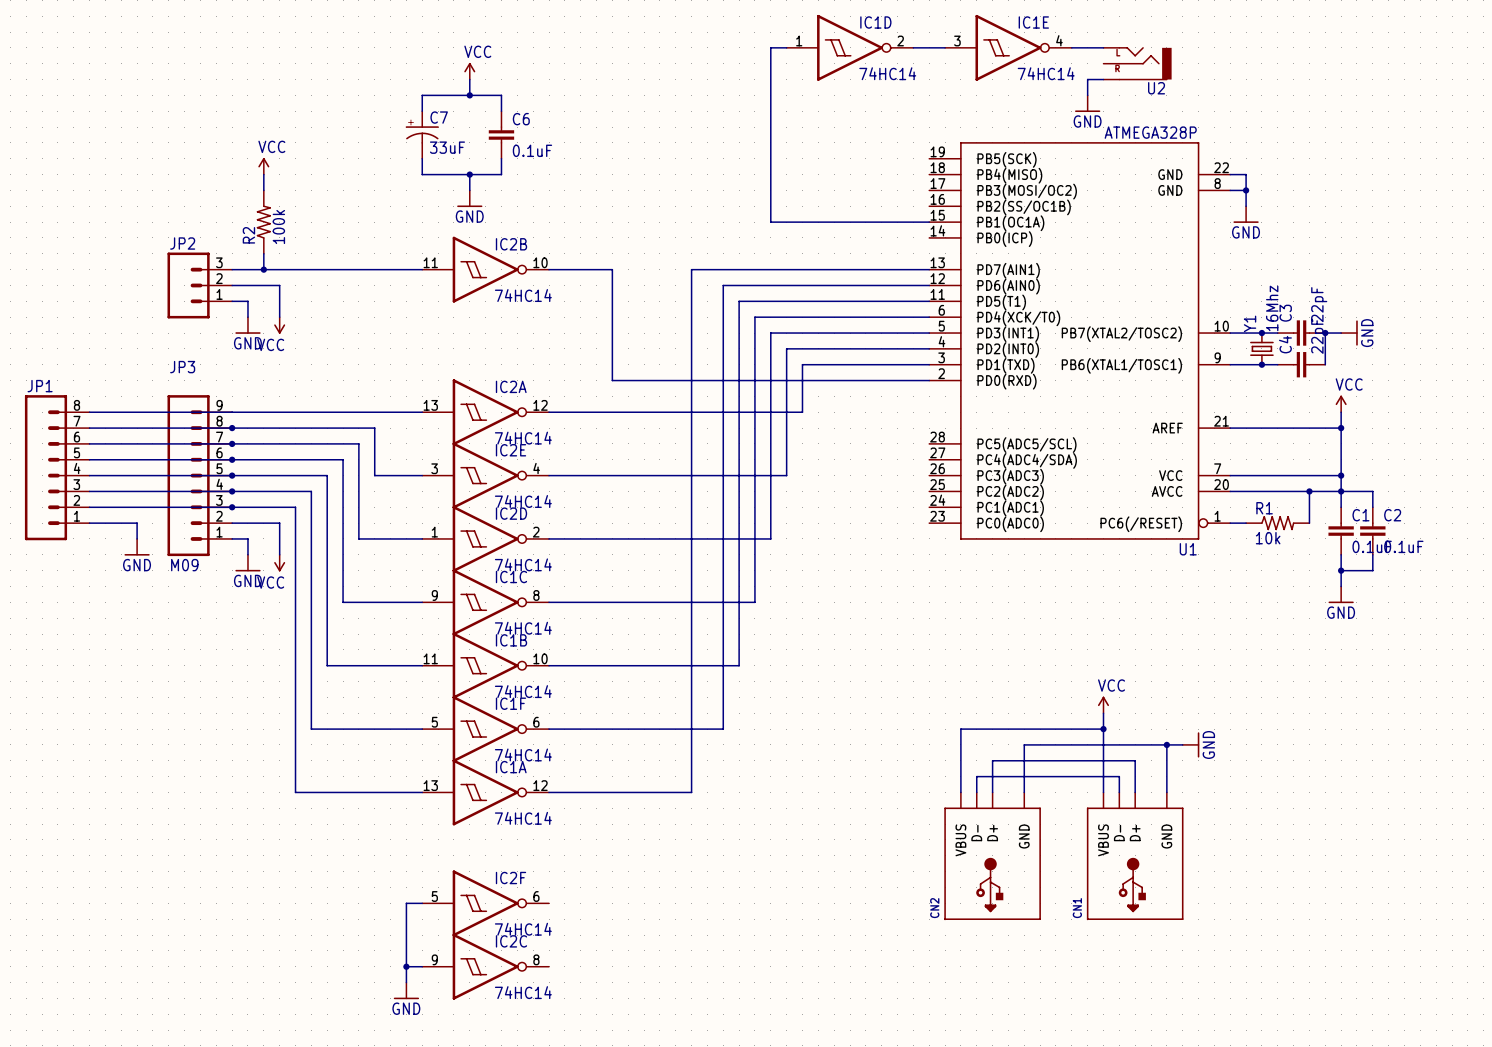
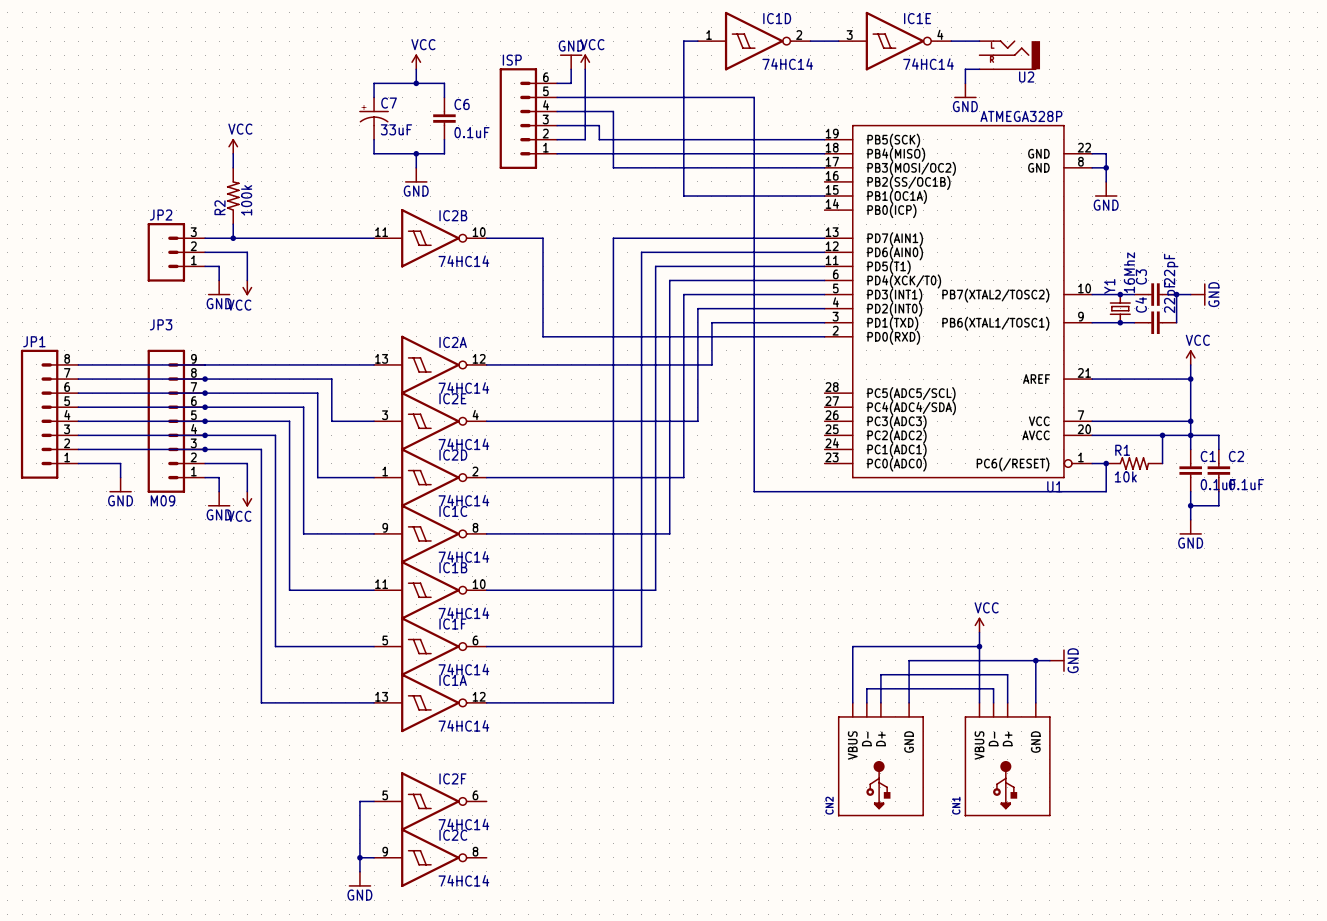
power symbol: none -> GND (571, 61)
power symbol: none -> VCC (585, 61)
wire: none -> (571, 69) (571, 83) (557, 83)
wire: none -> (585, 69) (585, 139) (557, 139)
wire: none -> (557, 97) (754, 97) (754, 491) (1106, 491) (1106, 463)
wire: none -> (557, 111) (613, 111) (613, 167) (824, 167)
ISP: none -> (528, 118)
wire: none -> (557, 125) (599, 125) (599, 139) (824, 139)
wire: none -> (557, 153) (824, 153)
junction: none -> (1106, 463)

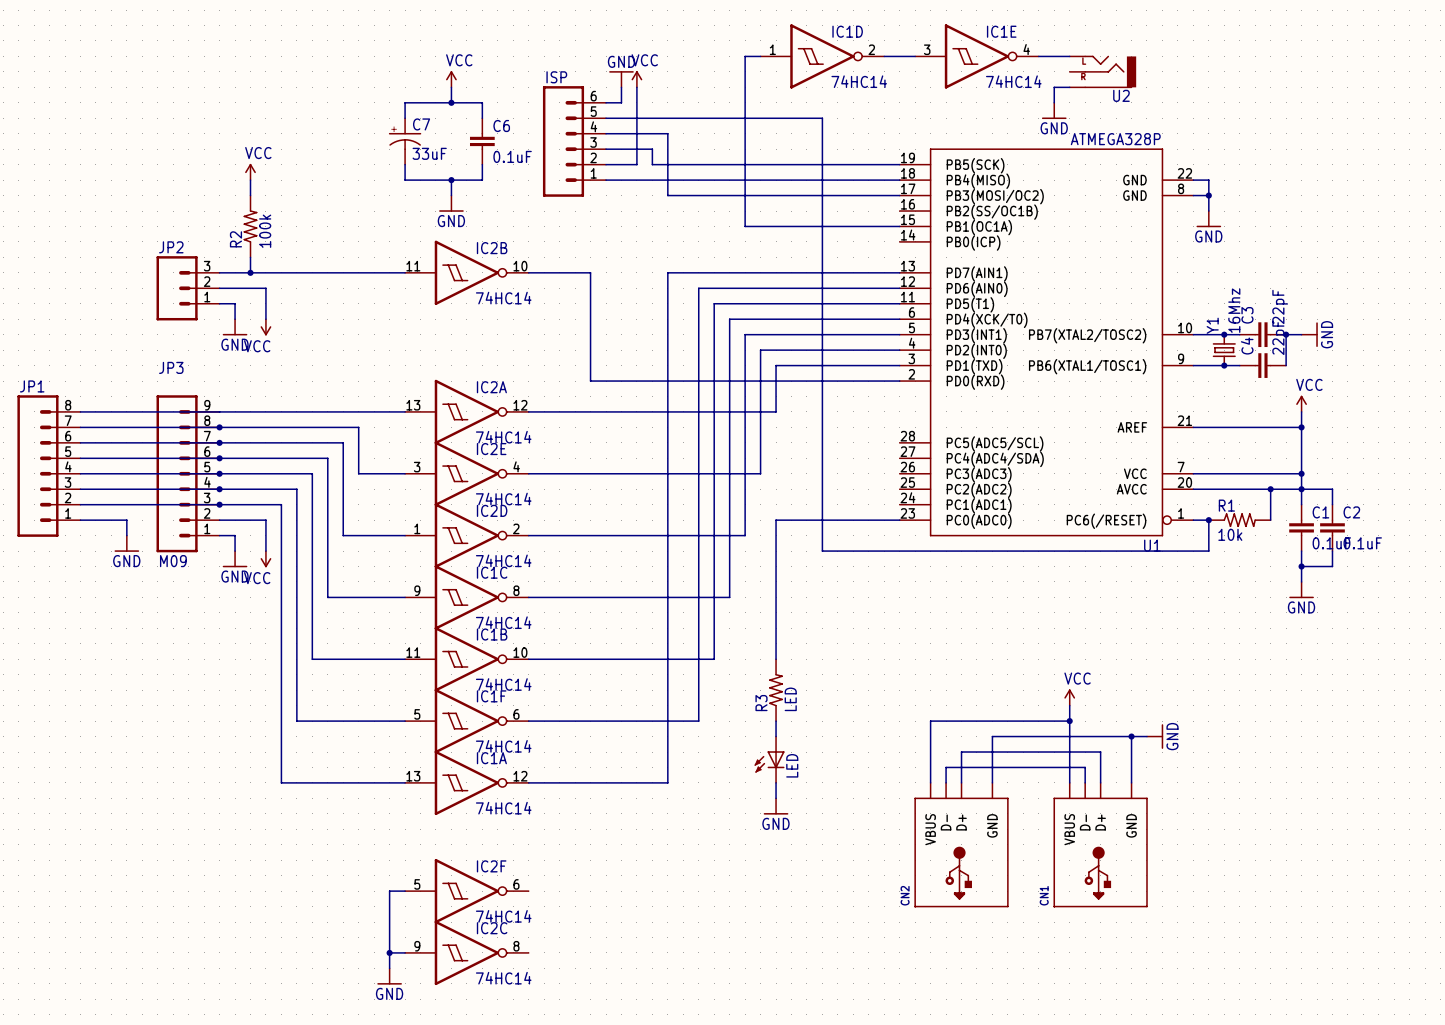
wire: none -> (899, 520) (776, 520) (776, 659)
R3: none -> LED (776, 690)
wire: none -> (776, 721) (776, 736)
LED: none -> (769, 759)
wire: none -> (776, 782) (776, 798)
power symbol: none -> GND (776, 806)

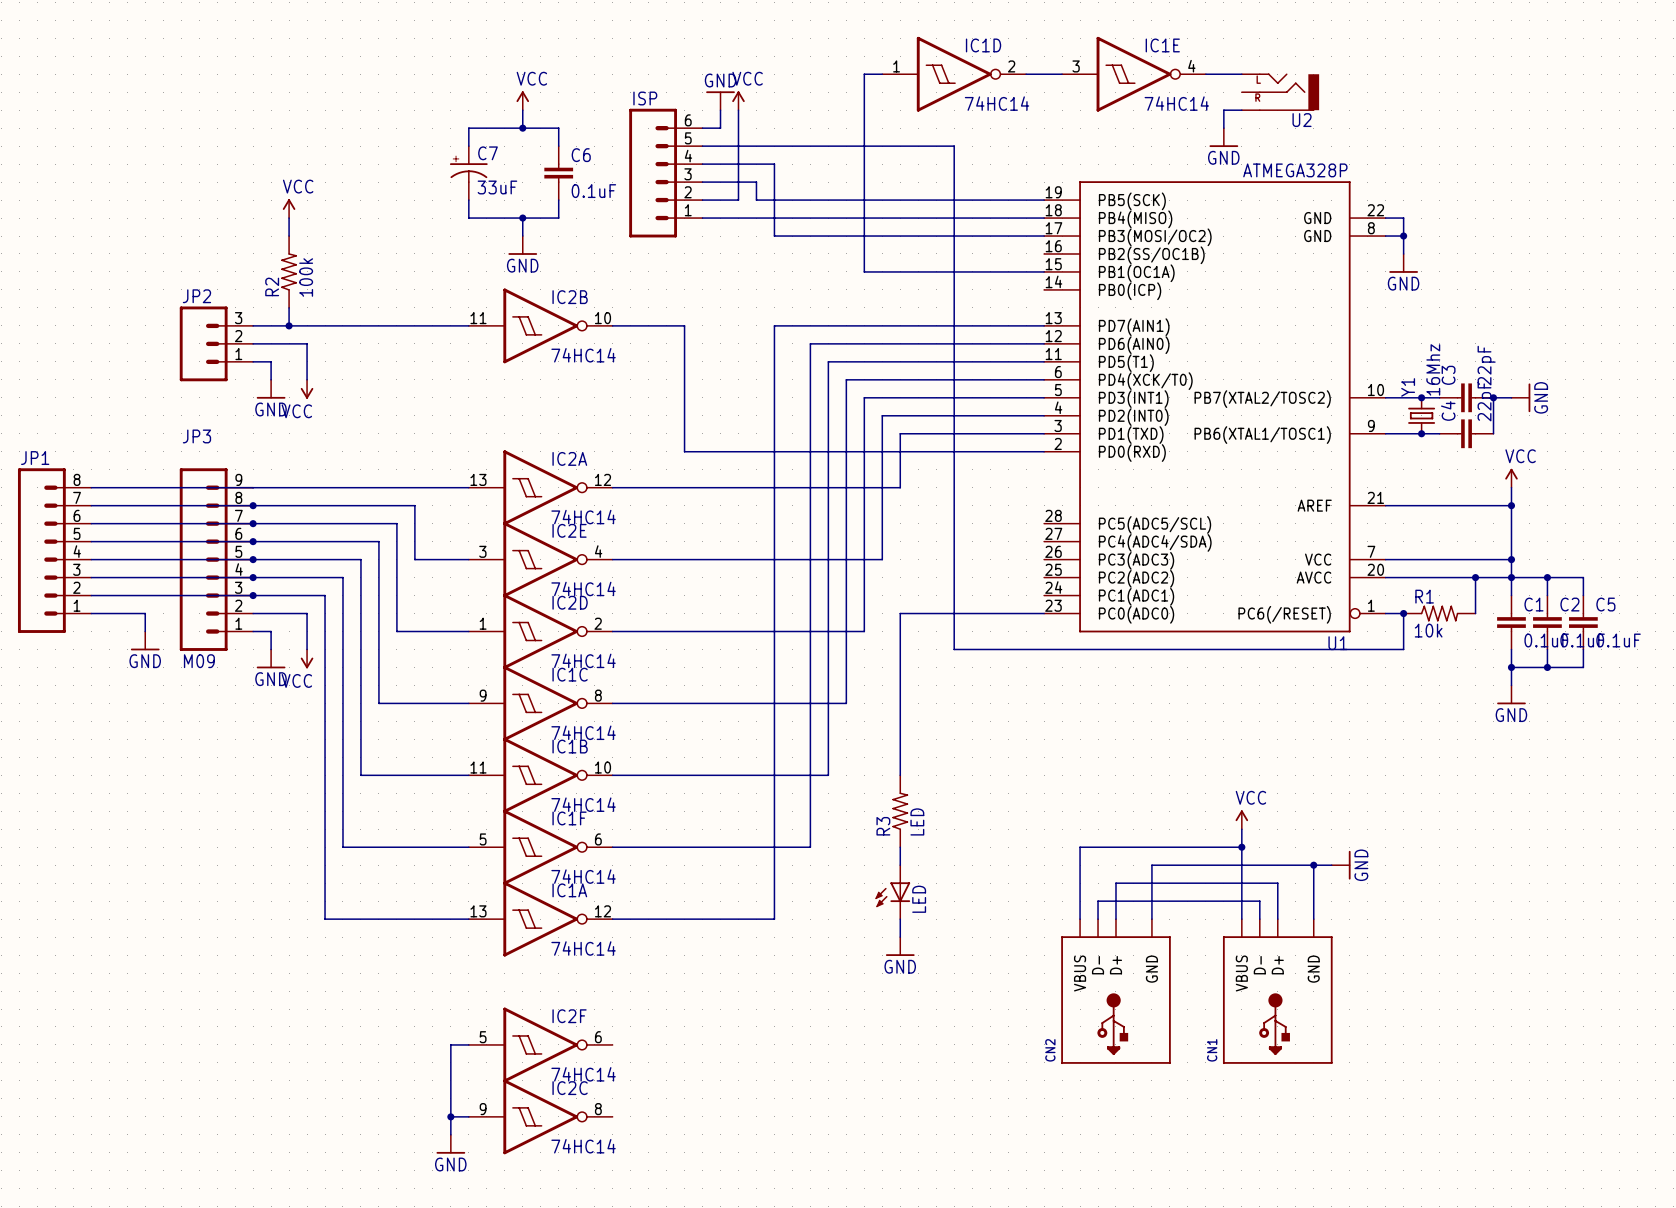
wire: none -> (1547, 577) (1583, 577) (1583, 595)
junction: none -> (1547, 577)
C5: none -> 0.1uF (1583, 622)
wire: none -> (1583, 649) (1583, 667) (1547, 667)
junction: none -> (1547, 667)

